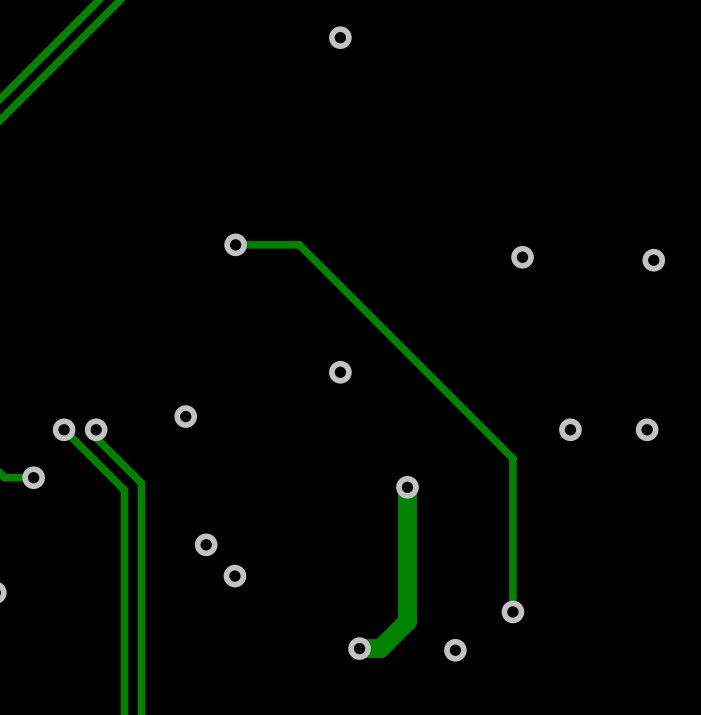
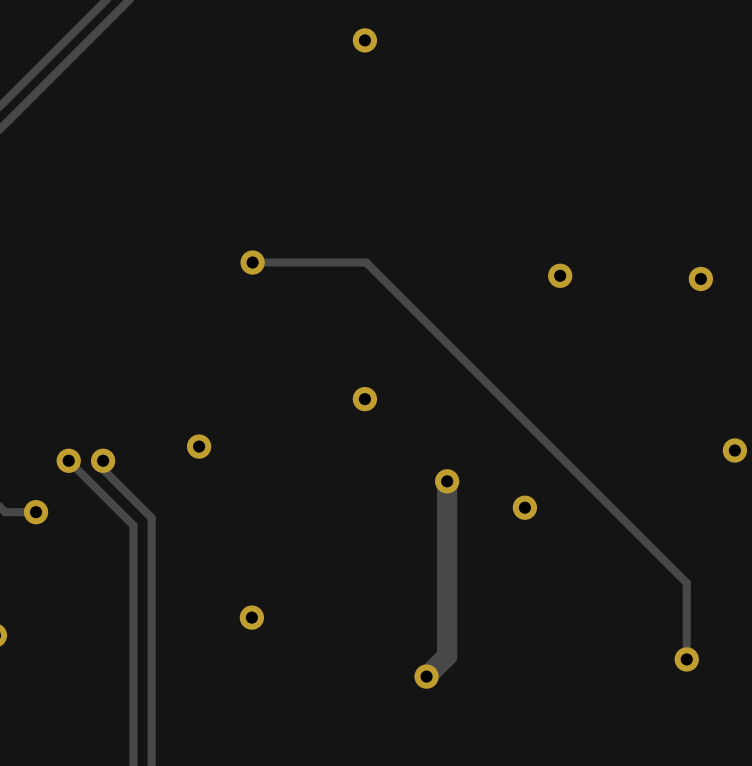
track: (299, 244) (512, 458) (512, 611) -> (320, 262) (366, 262) (686, 582) (686, 663)
via: (570, 429) -> none
via position: (647, 429) -> (734, 450)
via: none -> (524, 507)
track: (407, 487) (407, 621) -> (447, 481) (447, 656) (436, 666)
via position: (407, 487) -> (447, 481)
via: (206, 544) -> none
via: (512, 611) -> none
via: none -> (686, 659)
track: (397, 631) (380, 648) (359, 648) -> none
via: none -> (426, 676)
via: (359, 648) -> none
via: (455, 650) -> none

